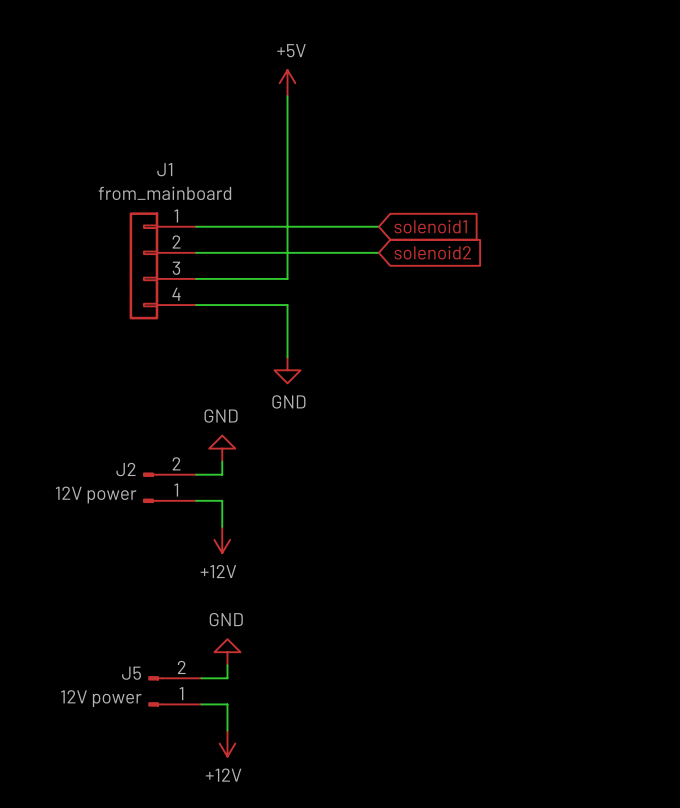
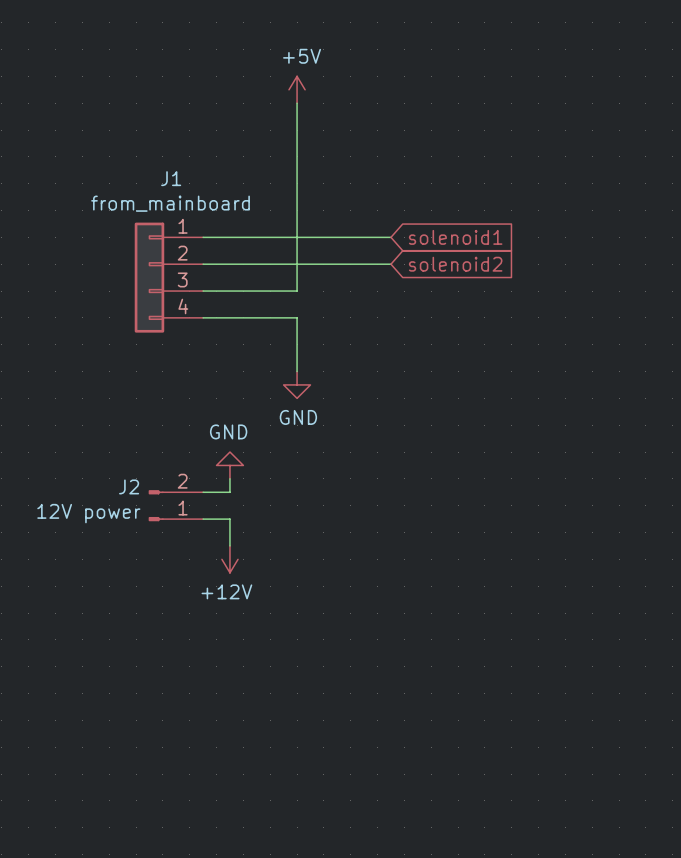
power symbol: GND (227, 652) -> none
wire: (227, 665) (227, 678) (201, 678) -> none
J5: 12V power (174, 691) -> none
wire: (201, 704) (227, 704) (227, 730) -> none
power symbol: +12V (227, 743) -> none

